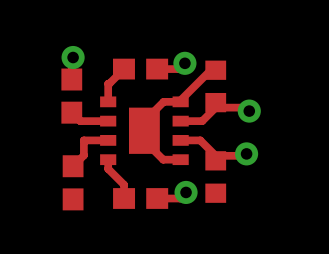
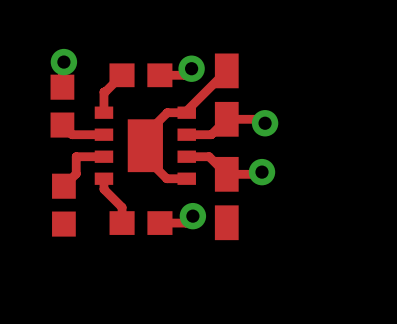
part footprint: [205, 60, 227, 113] -> [214, 53, 239, 137]
part footprint: [205, 151, 227, 203] -> [214, 156, 239, 241]

